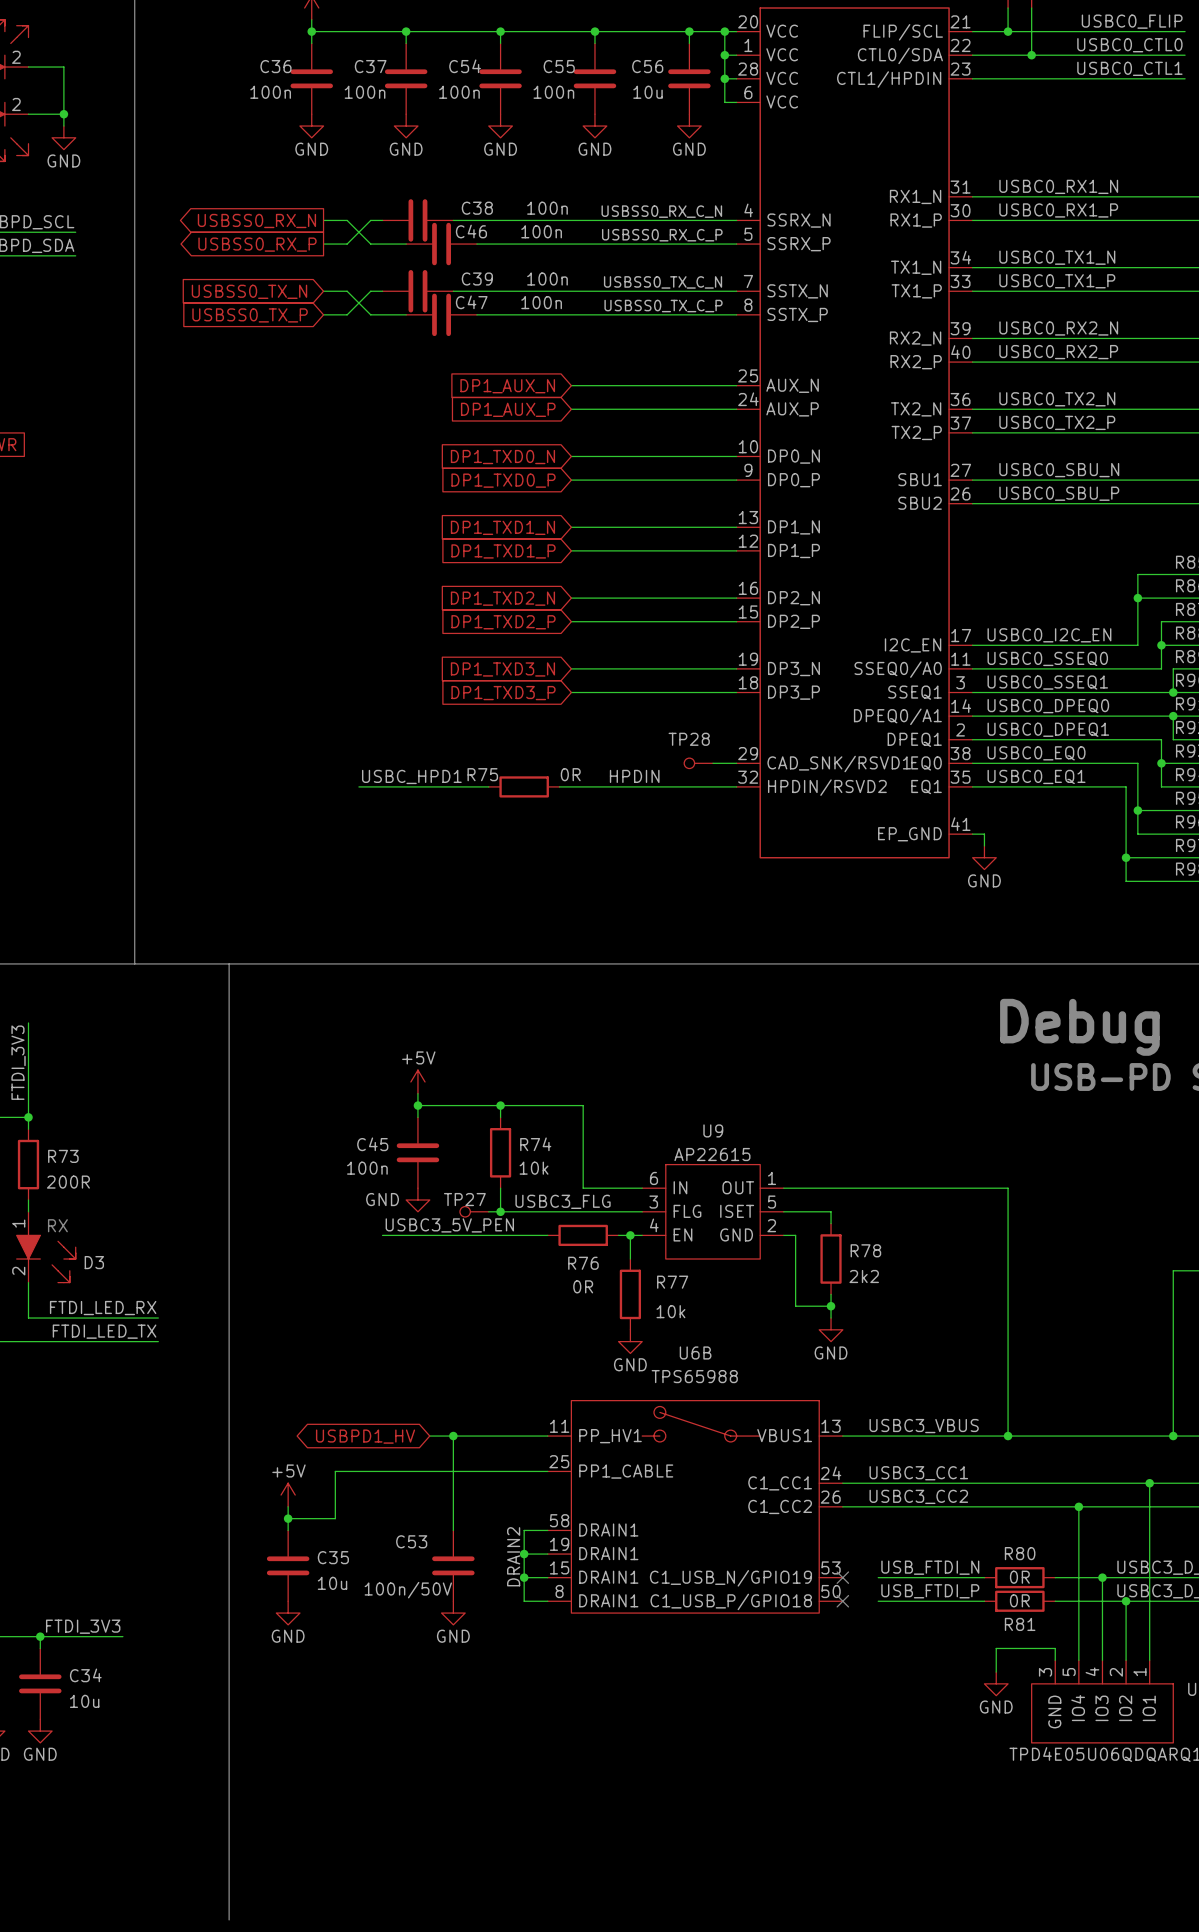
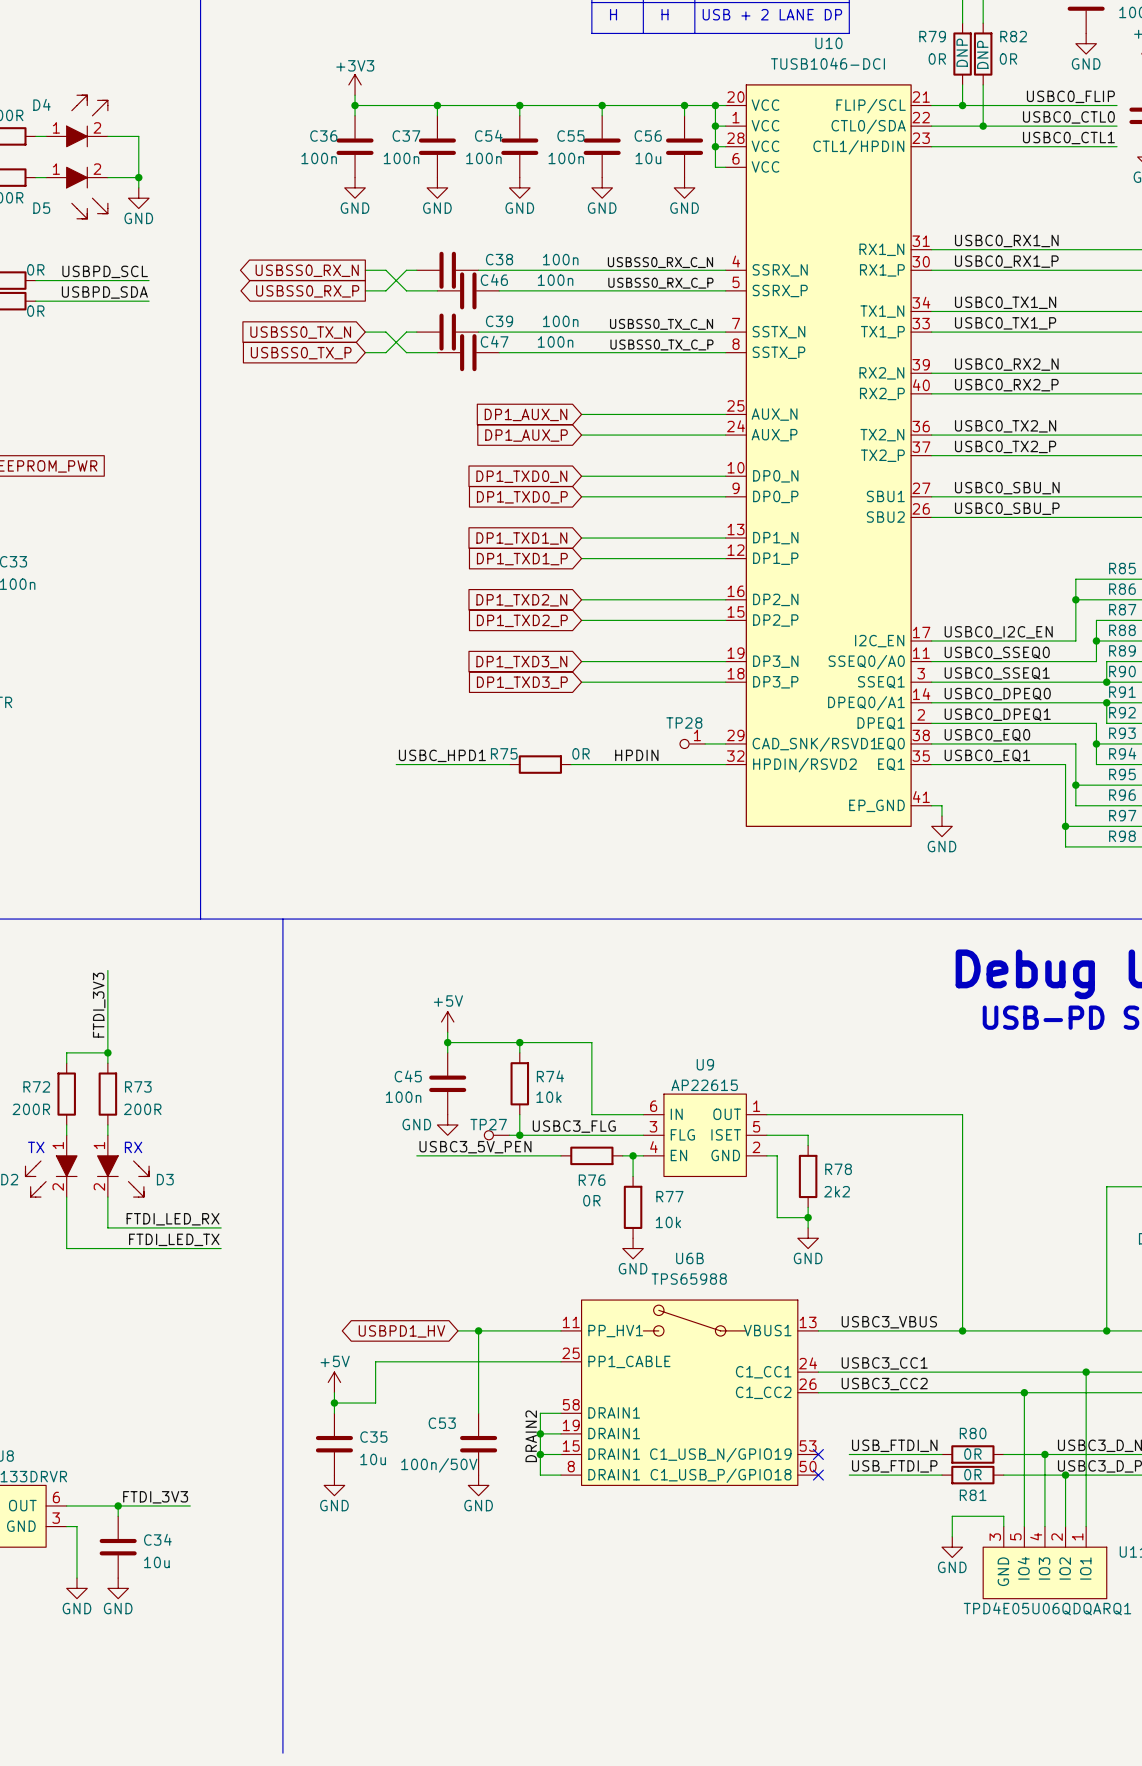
TP28 pin number: none -> 1 (697, 735)

